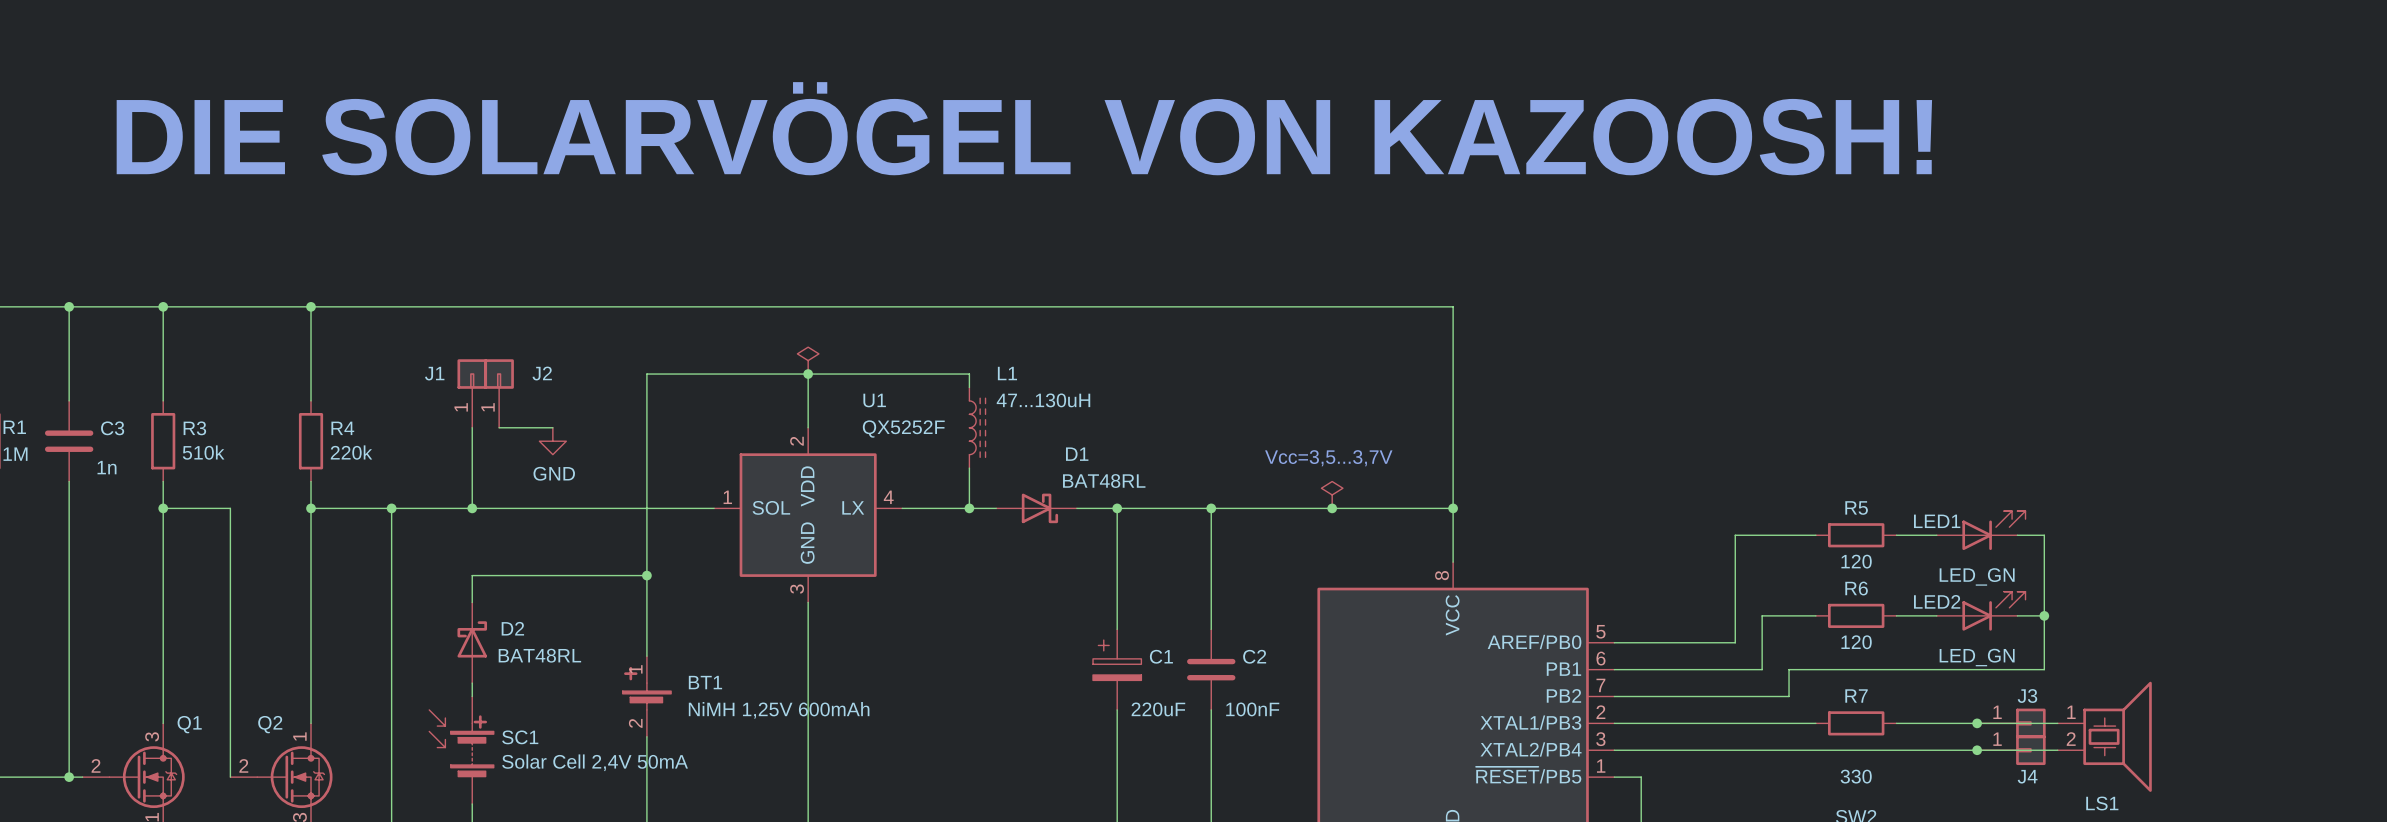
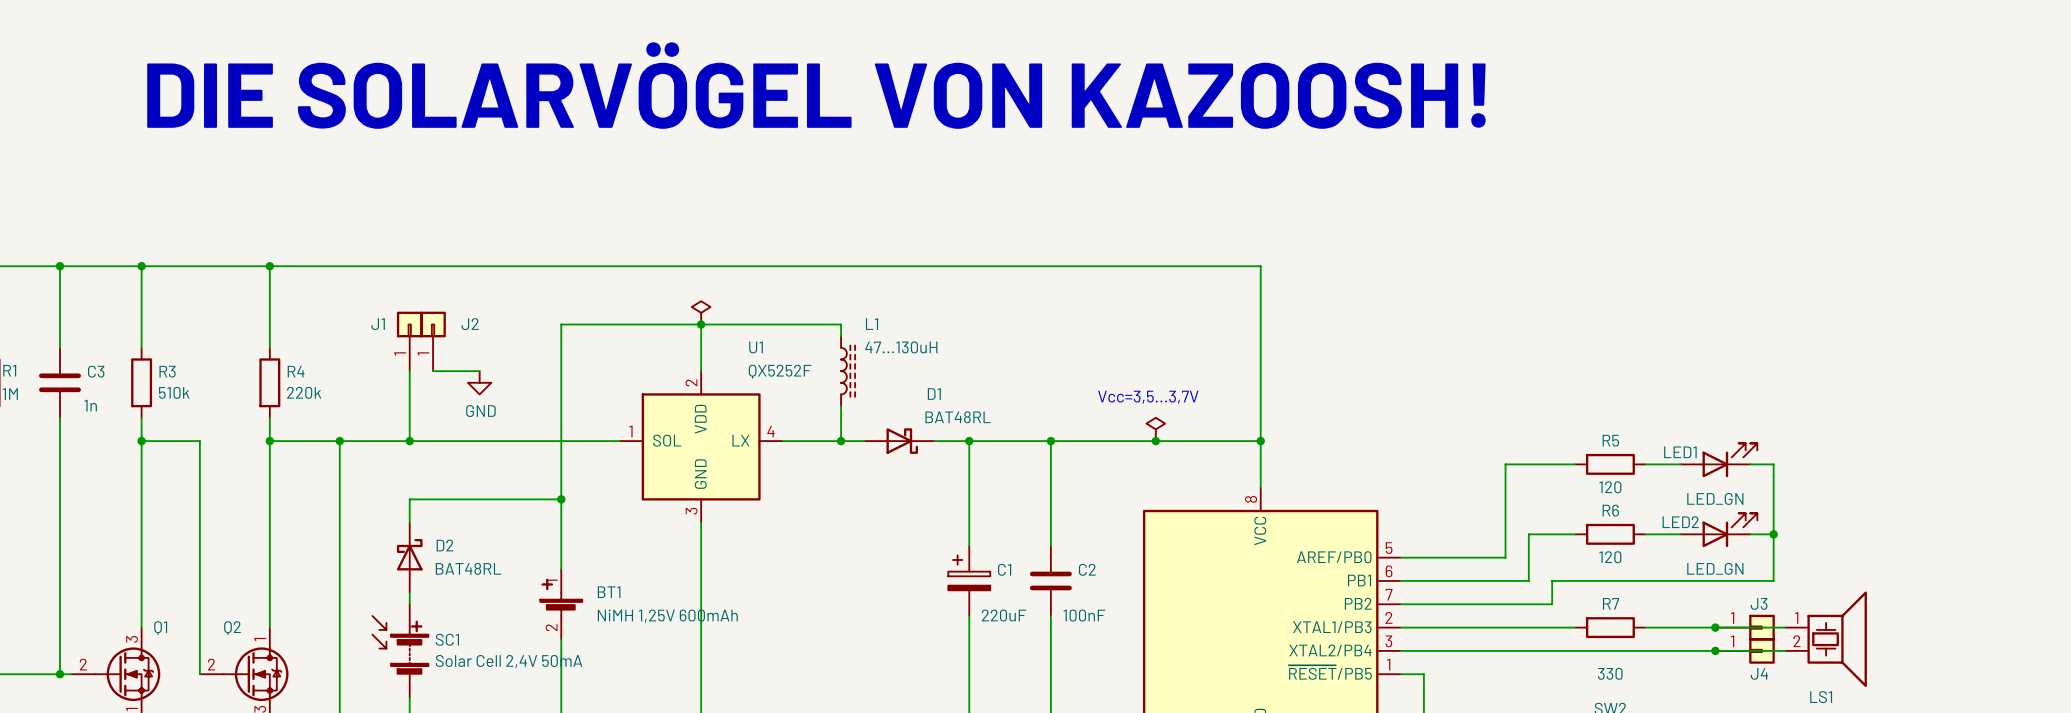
text position: DIE SOLARVÖGEL VON KAZOOSH! (1024, 128) -> DIE SOLARVÖGEL VON KAZOOSH! (816, 85)

